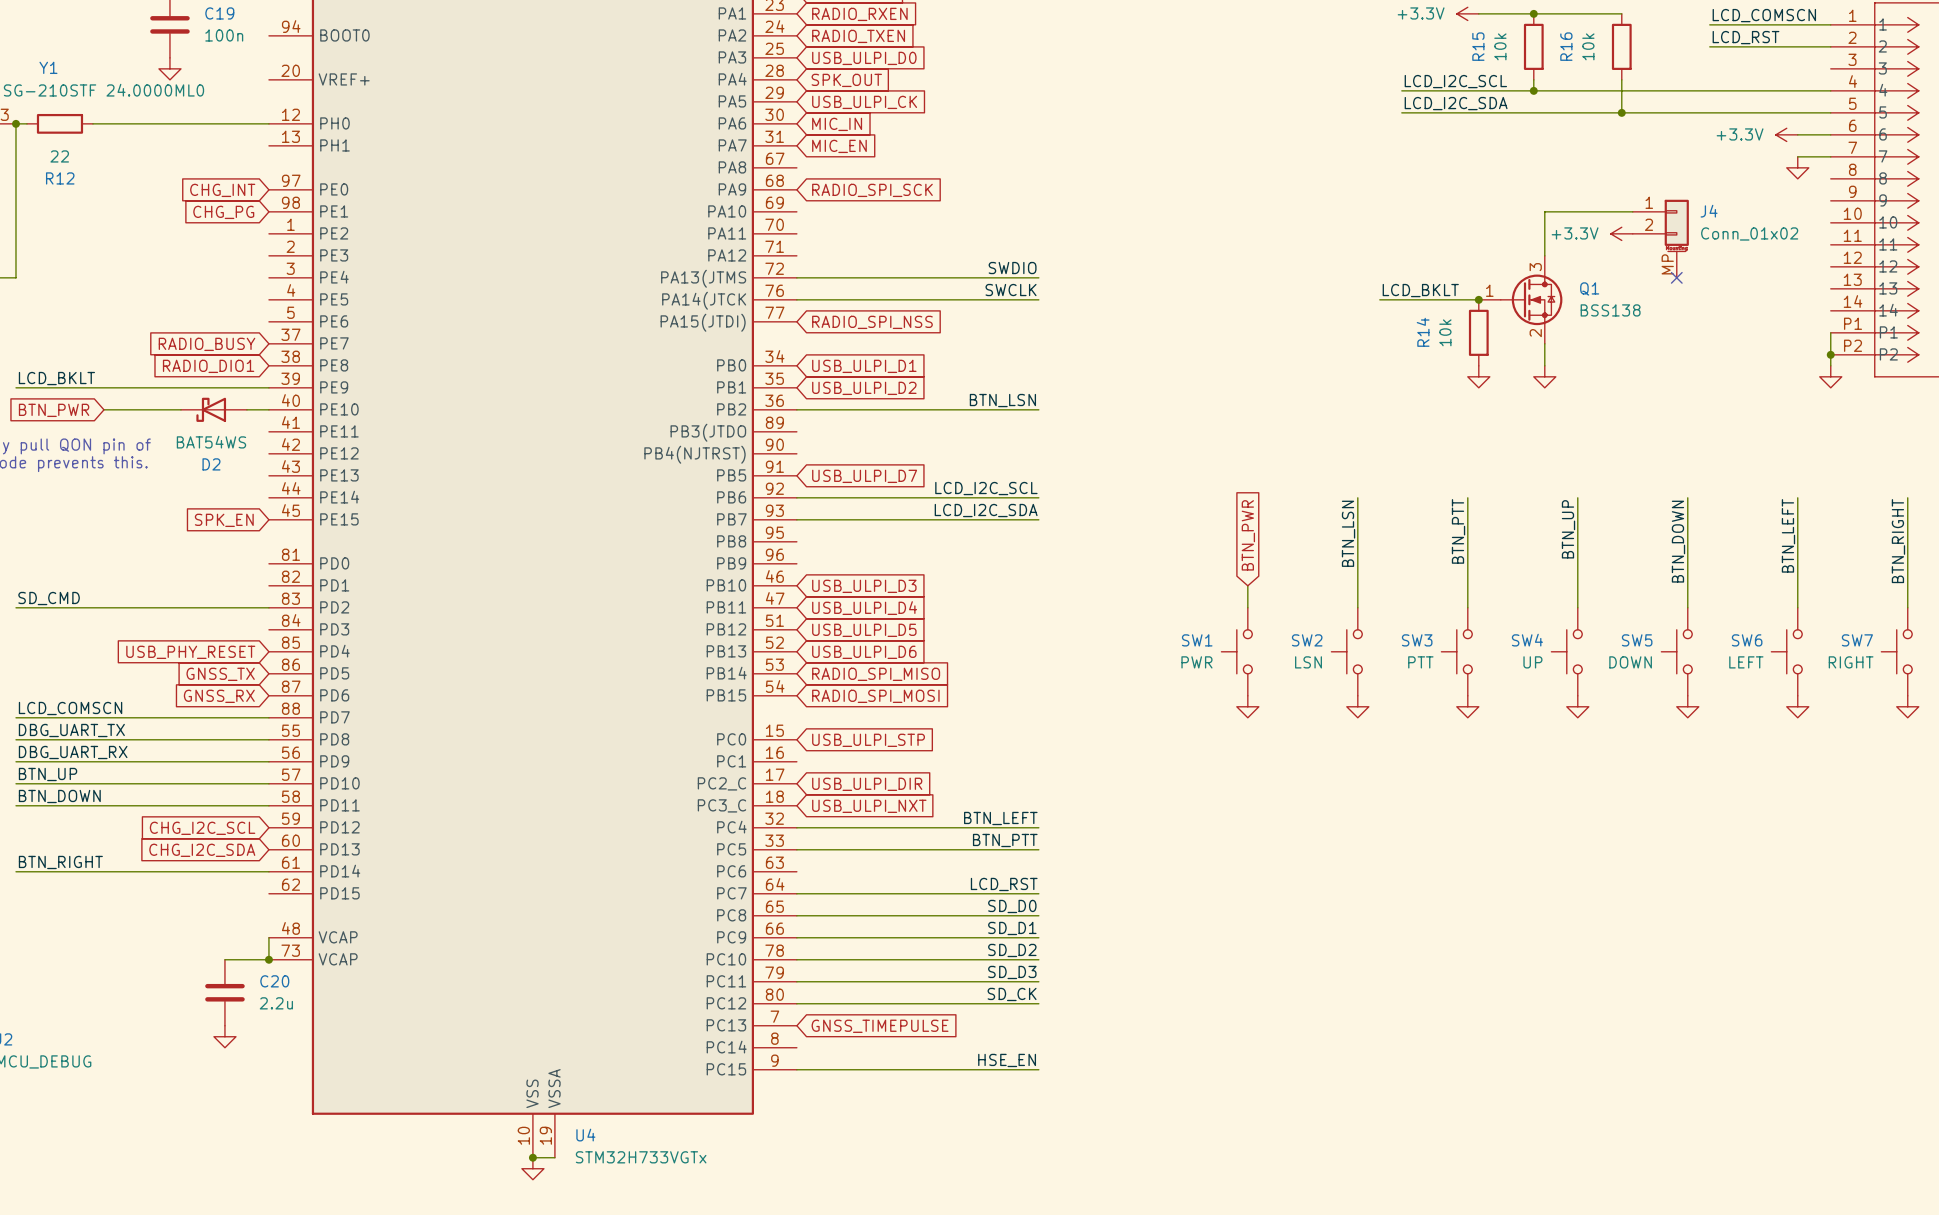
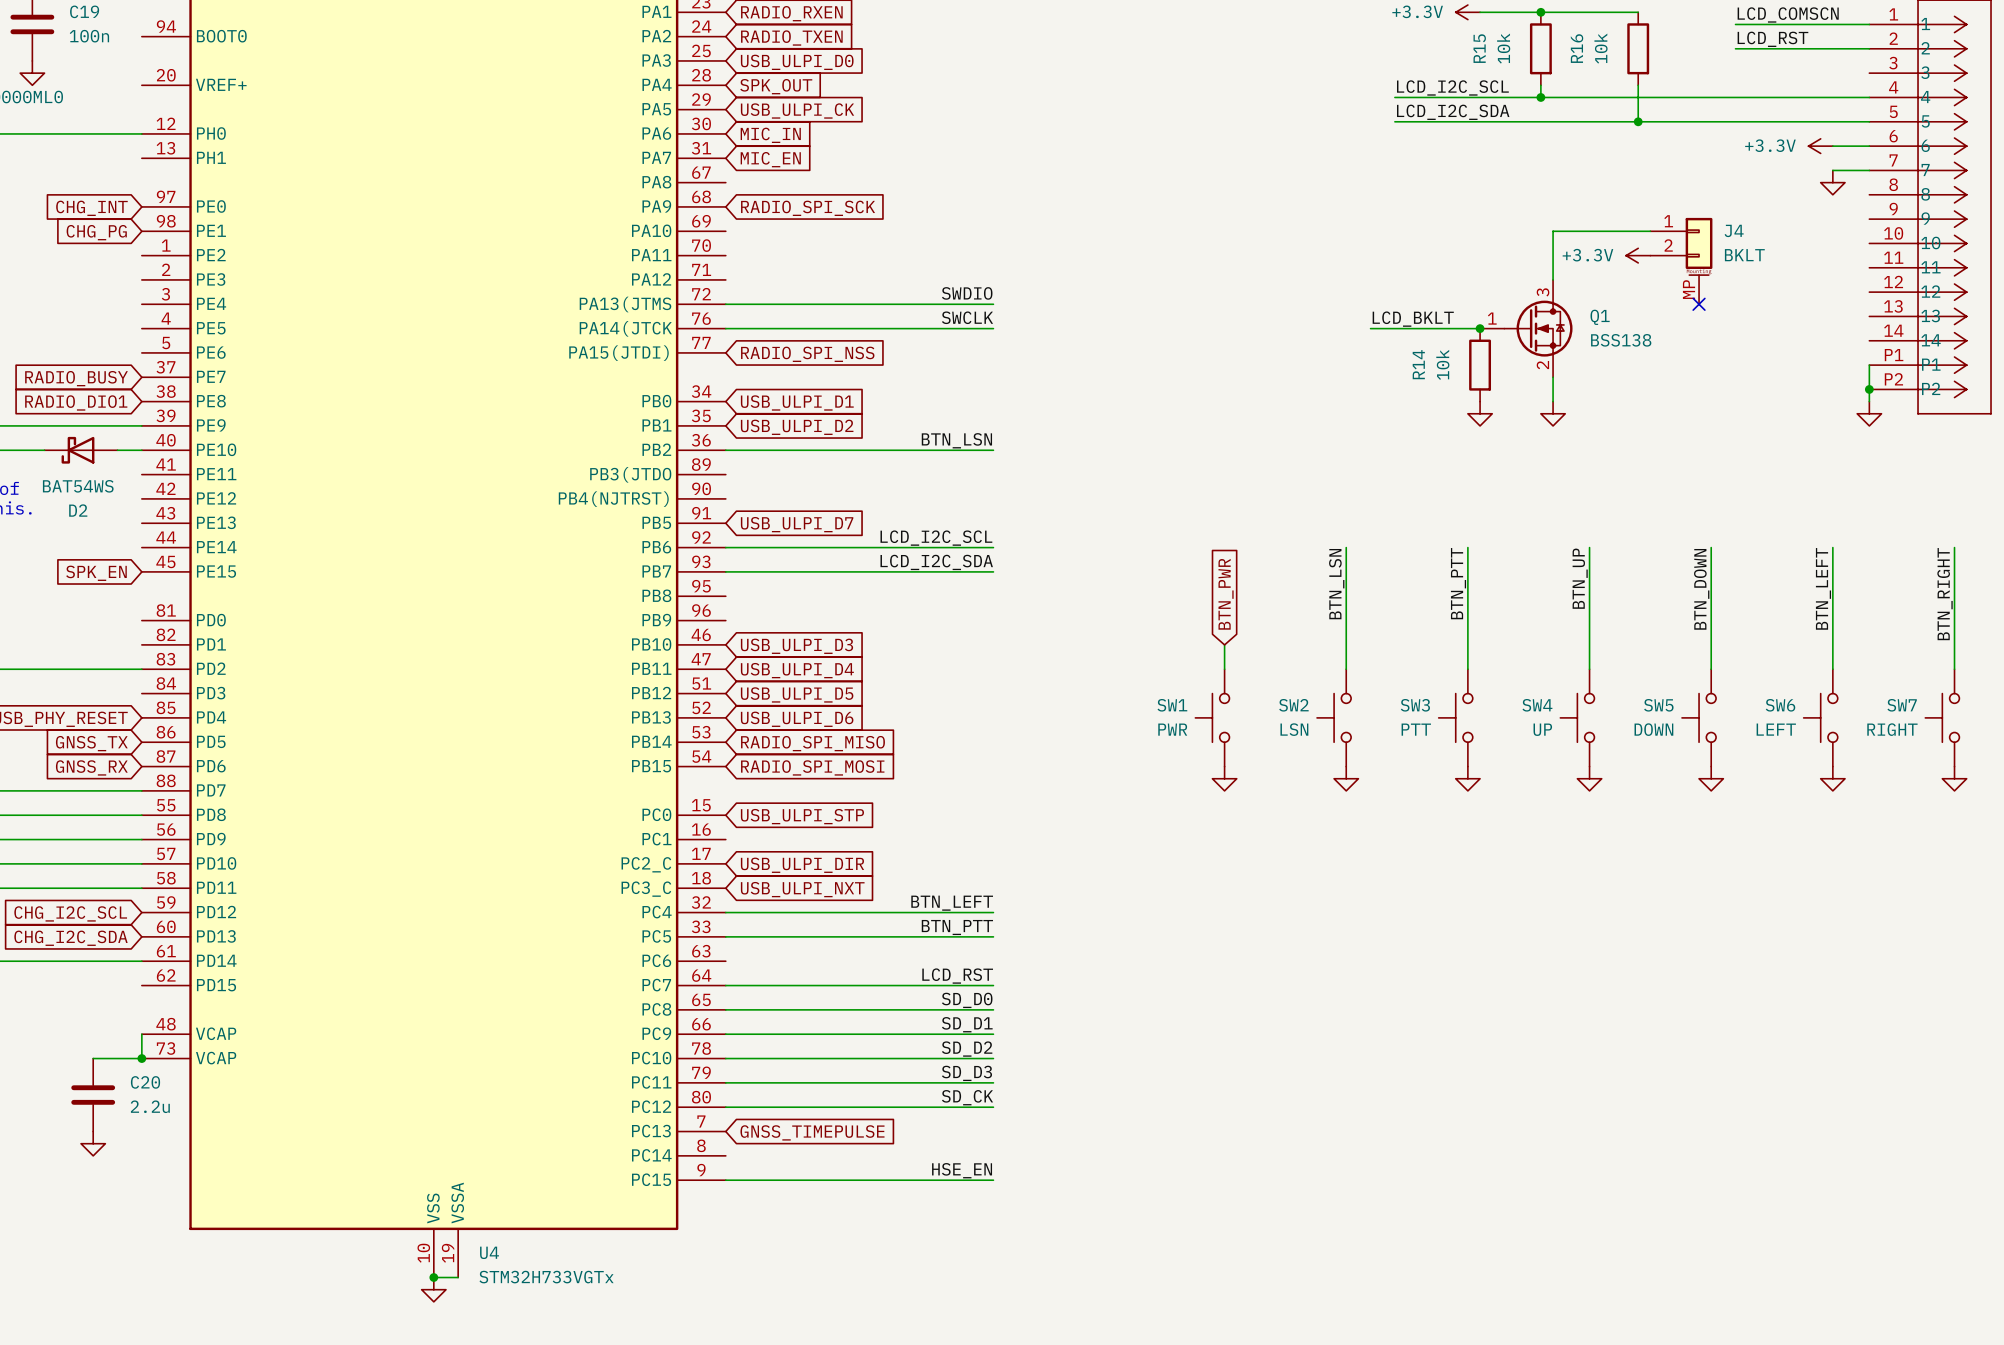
J4 value: Conn_01x02 (1749, 233) -> BKLT (1744, 255)

